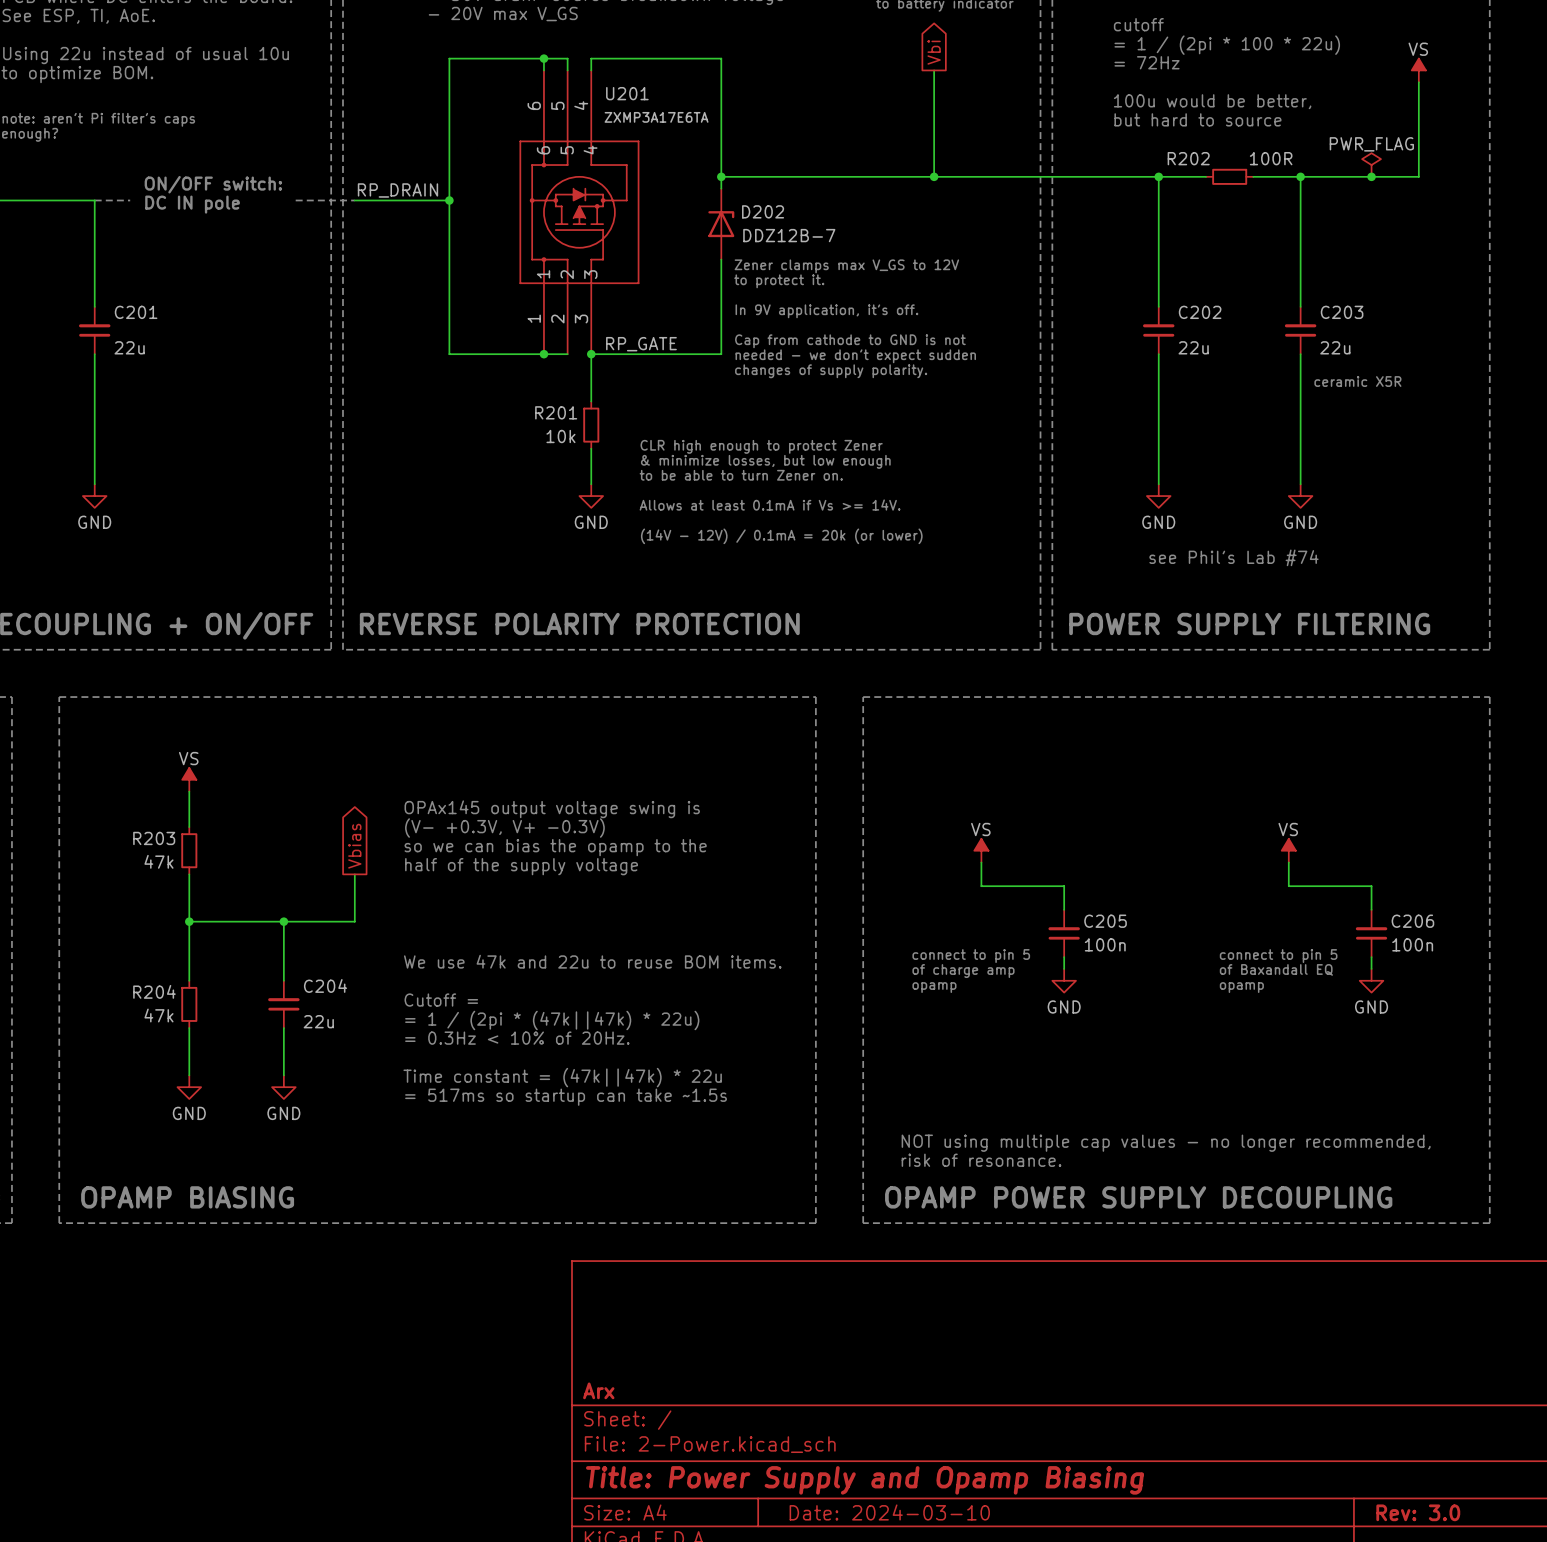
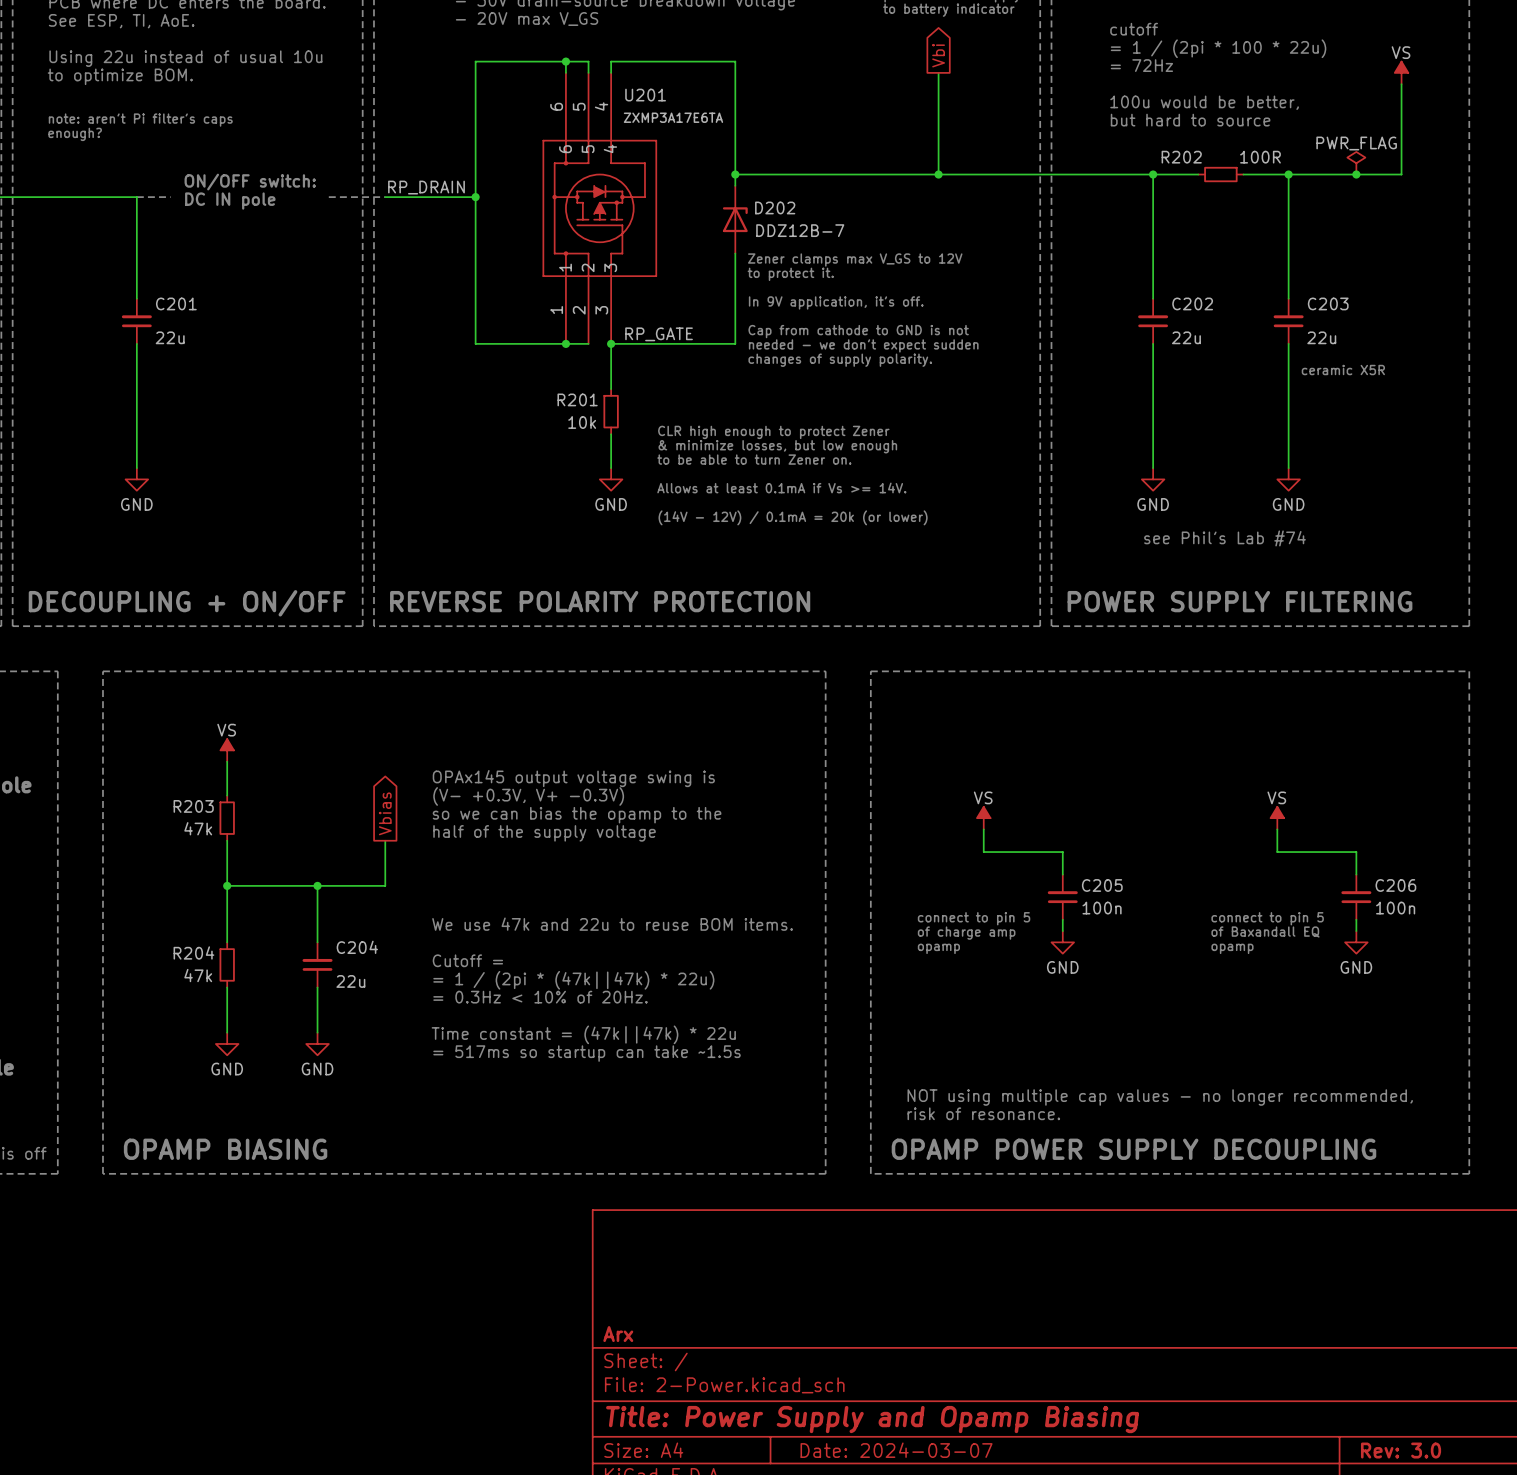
title block: Date: 2024-03-10 (889, 1512) -> Date: 2024-03-07 (896, 1450)

